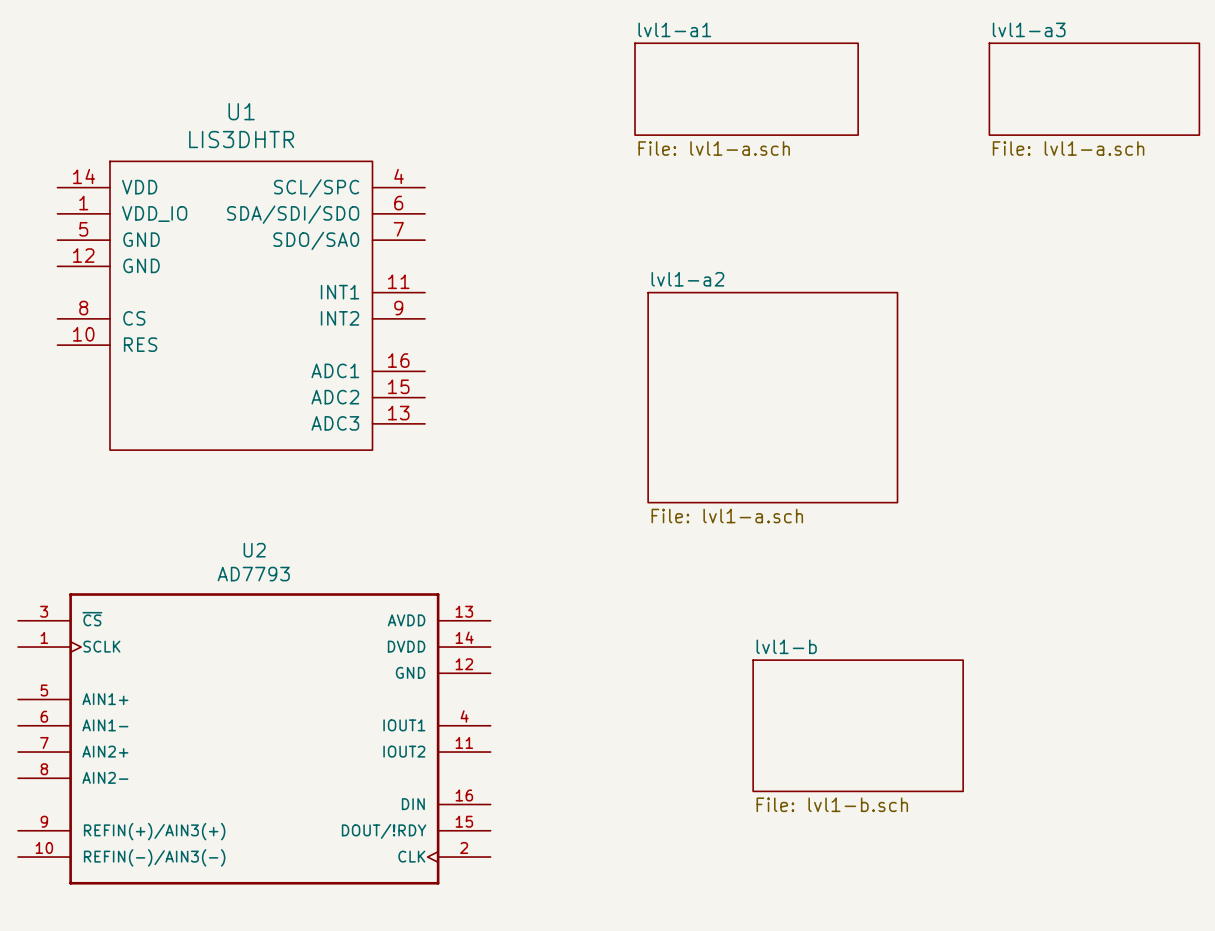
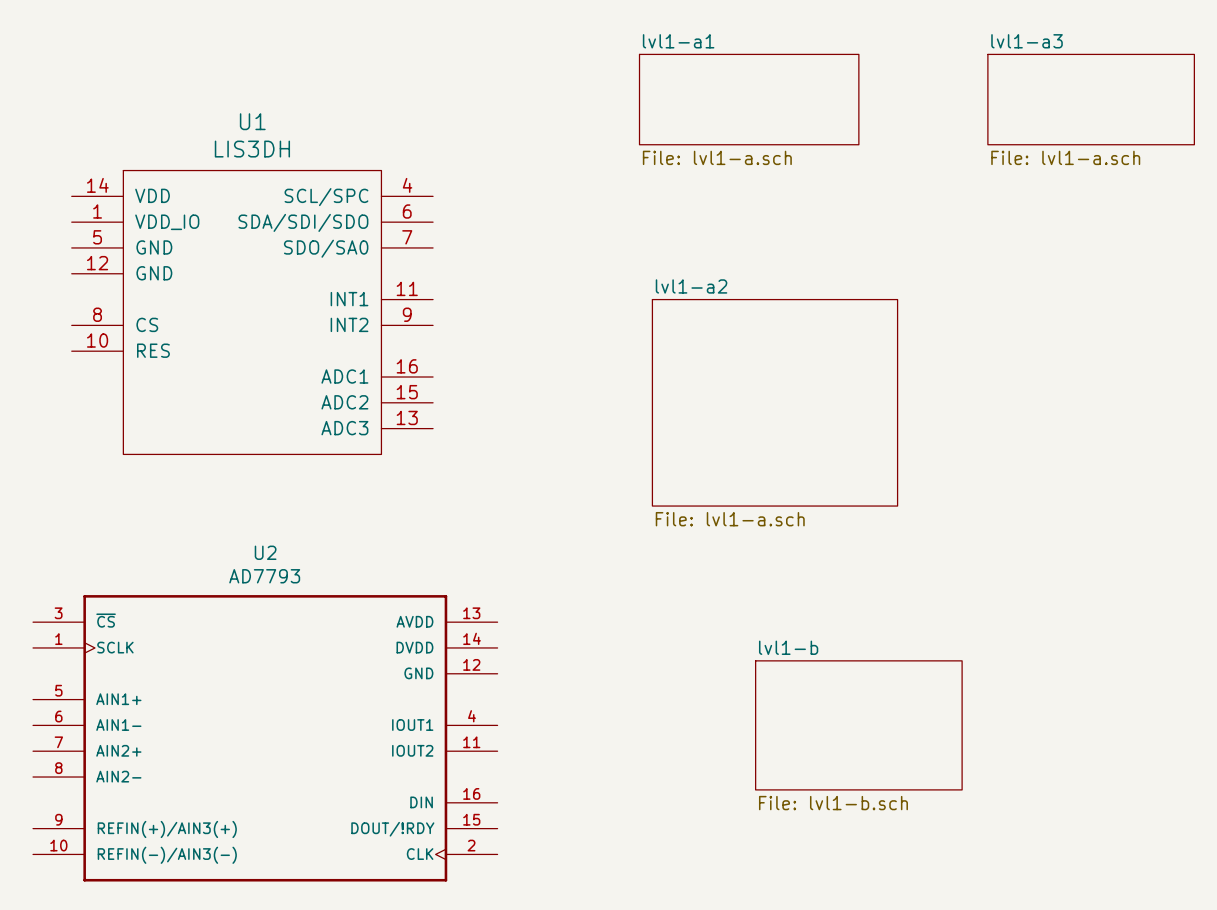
U1 value: LIS3DHTR (241, 139) -> LIS3DH (252, 149)

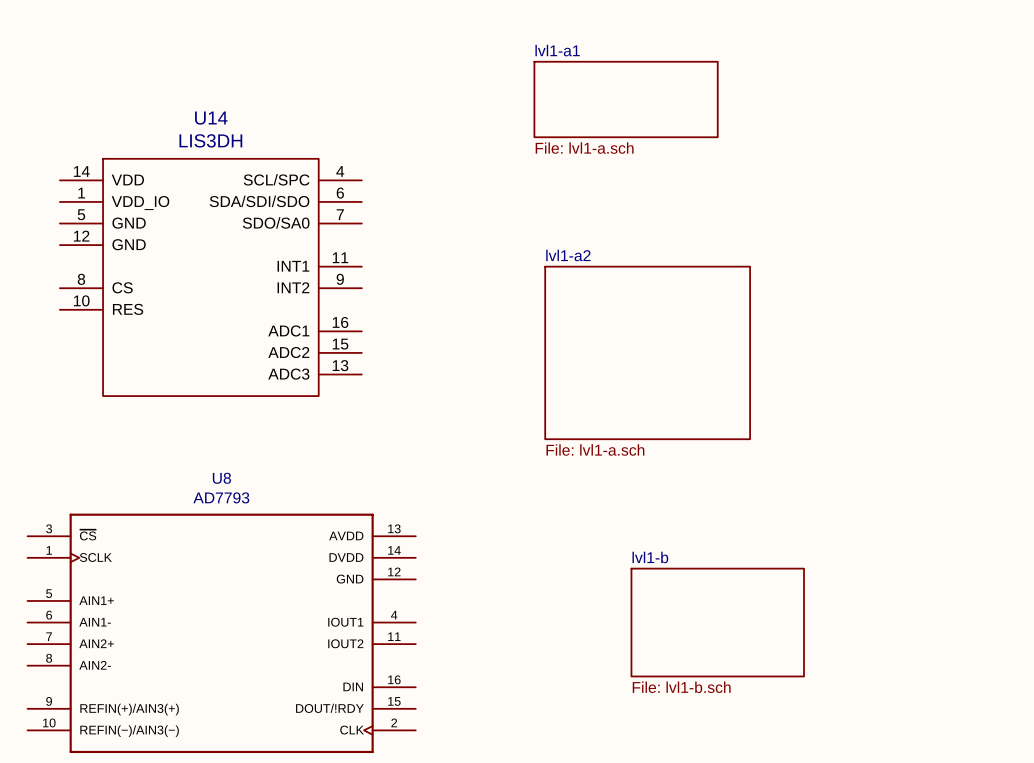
sheet lvl1-a3: File: lvl1-a.sch (1091, 99) -> none
U1 name: U1 (252, 121) -> U14 (211, 118)
U2 name: U2 (265, 552) -> U8 (221, 478)

